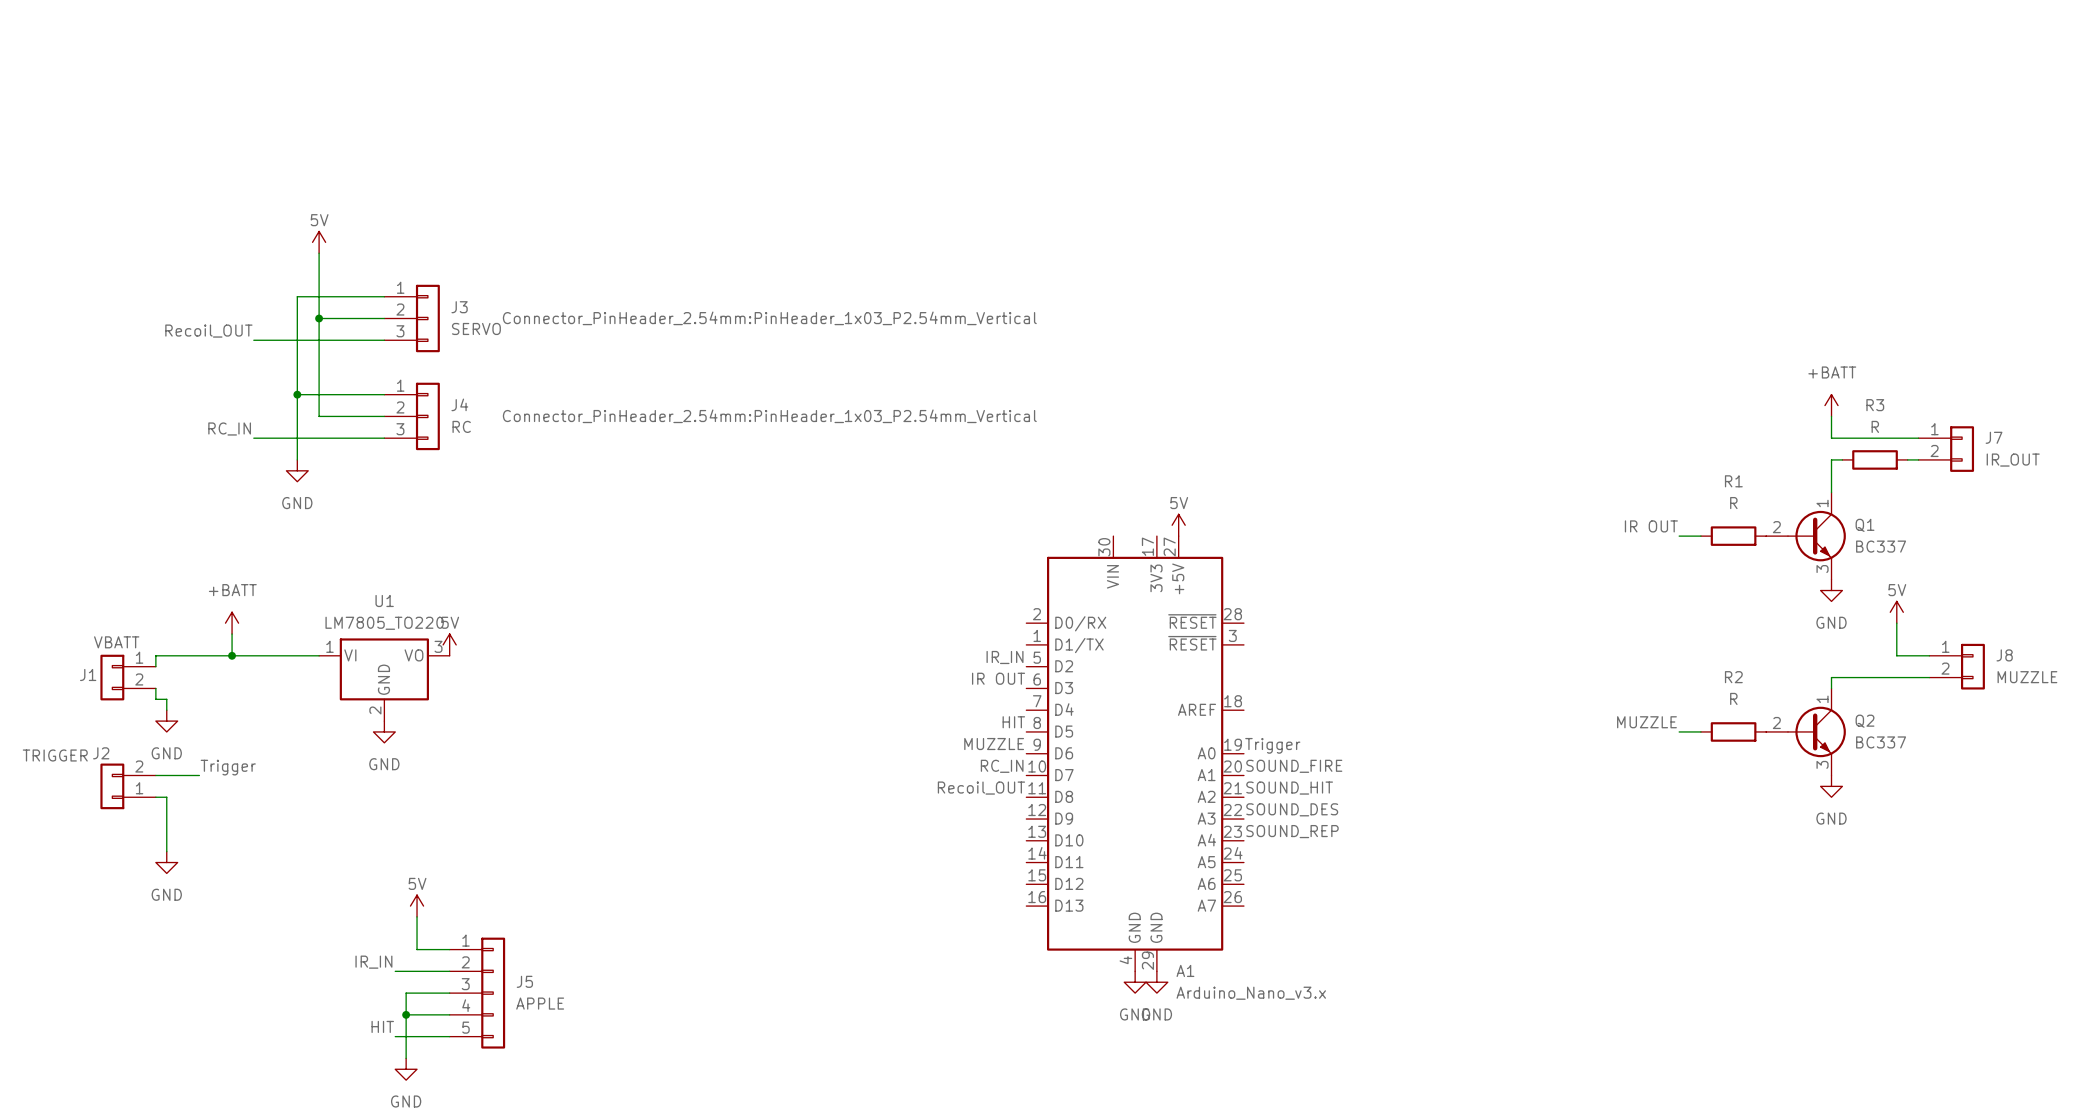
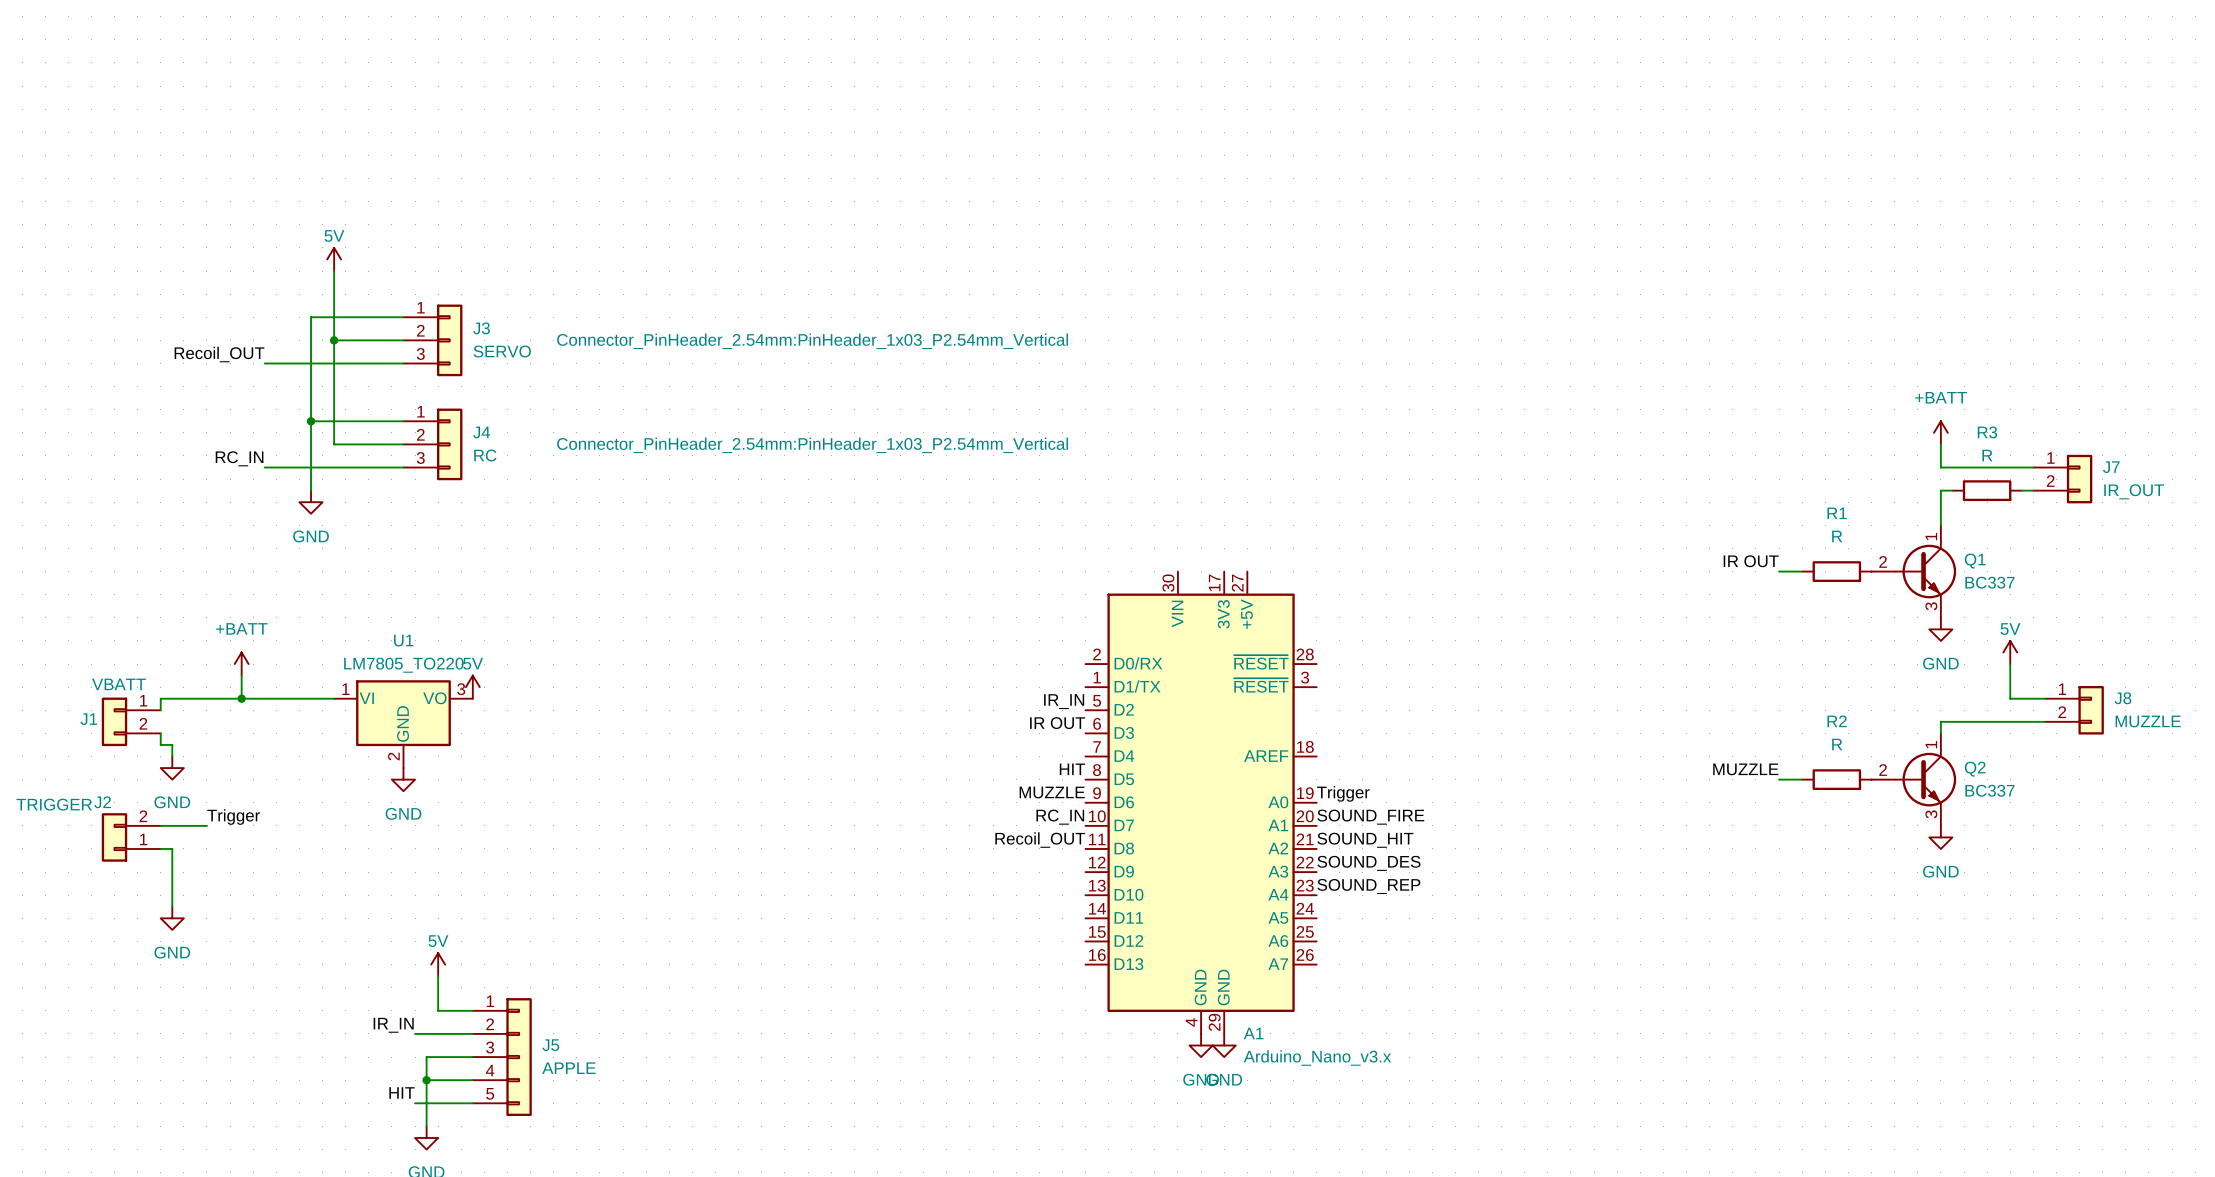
power symbol: 5V (1178, 525) -> none

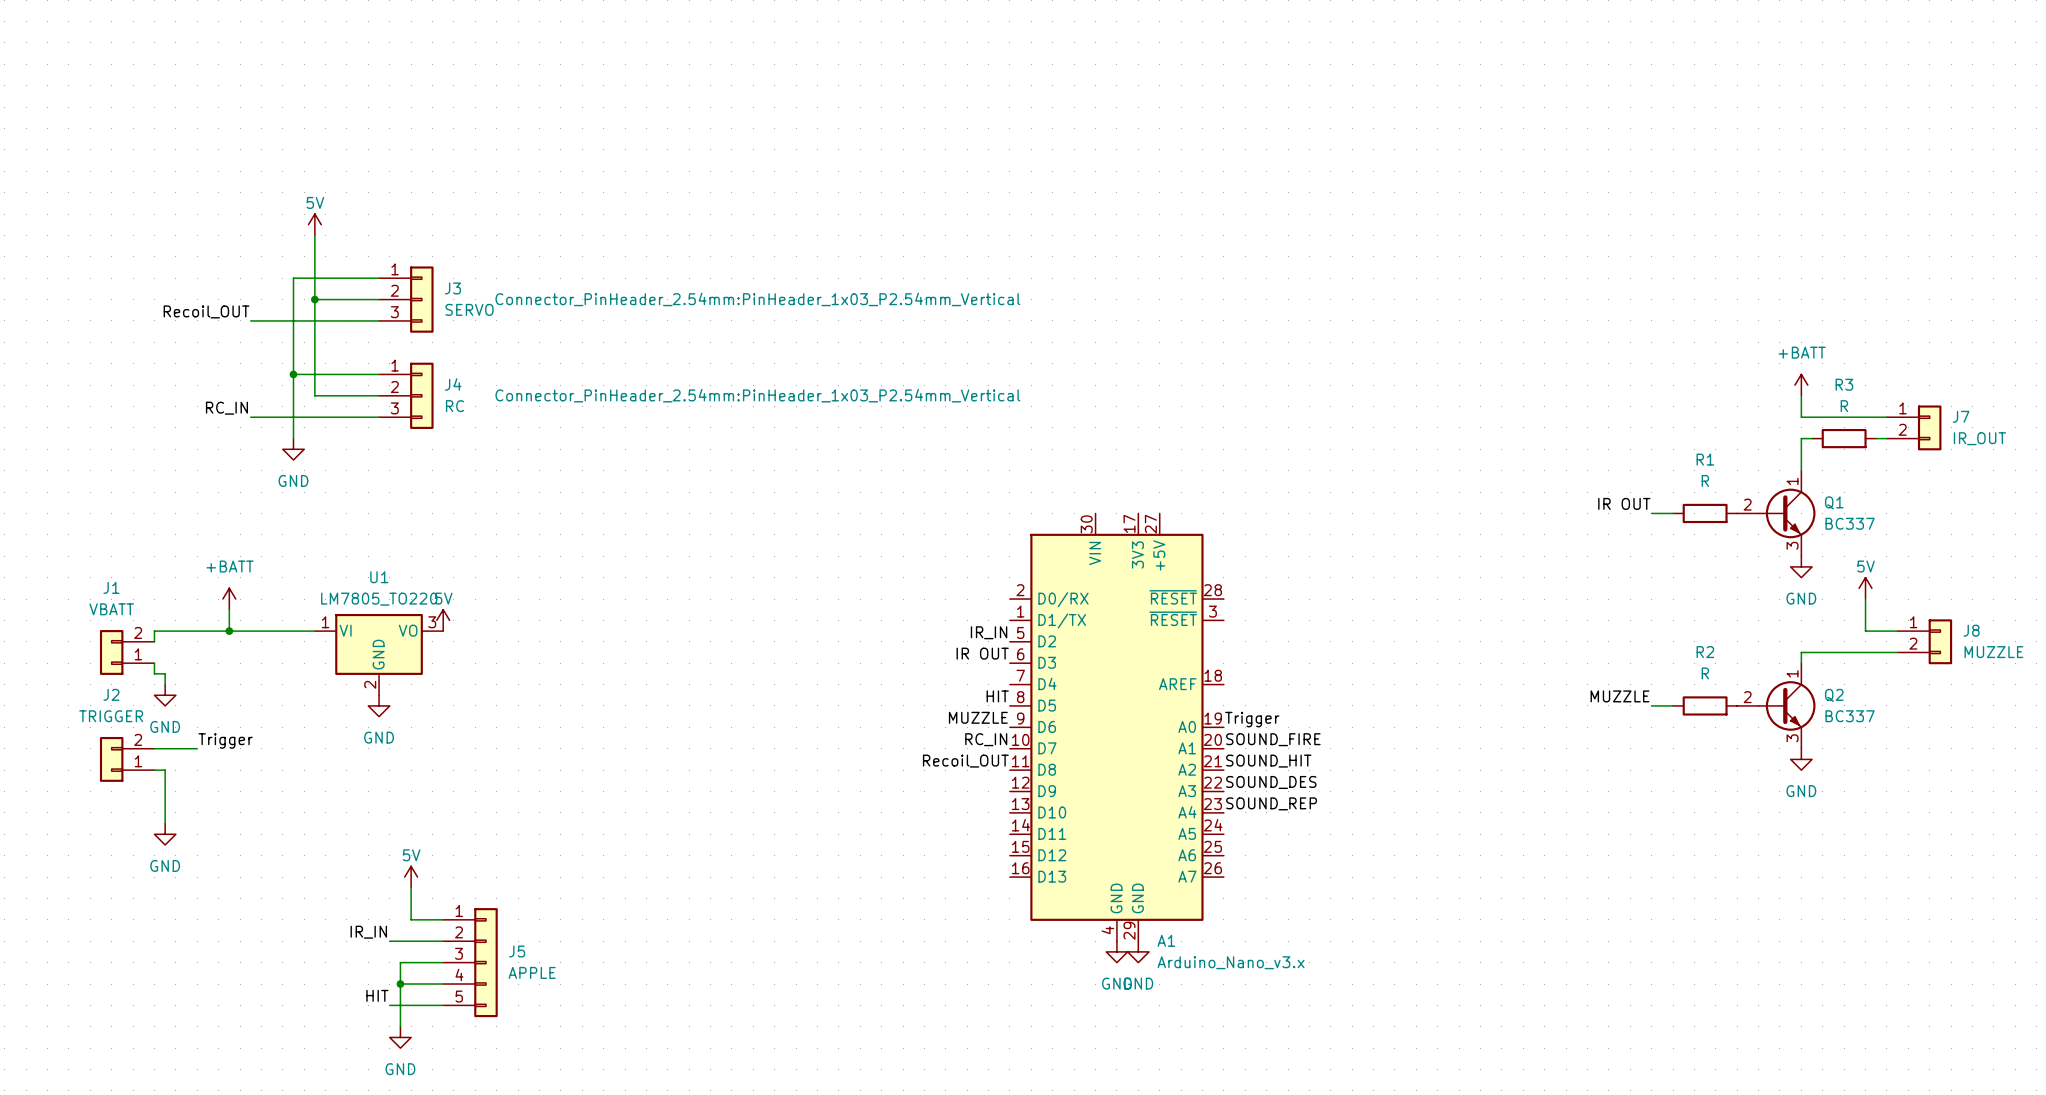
J1 name position: J1 (88, 719) -> J1 (111, 587)
J1 flip: as is (114, 721) -> up-down (111, 652)
J2 name position: J2 (102, 802) -> J2 (111, 694)
J2 value position: TRIGGER (54, 804) -> TRIGGER (111, 716)

